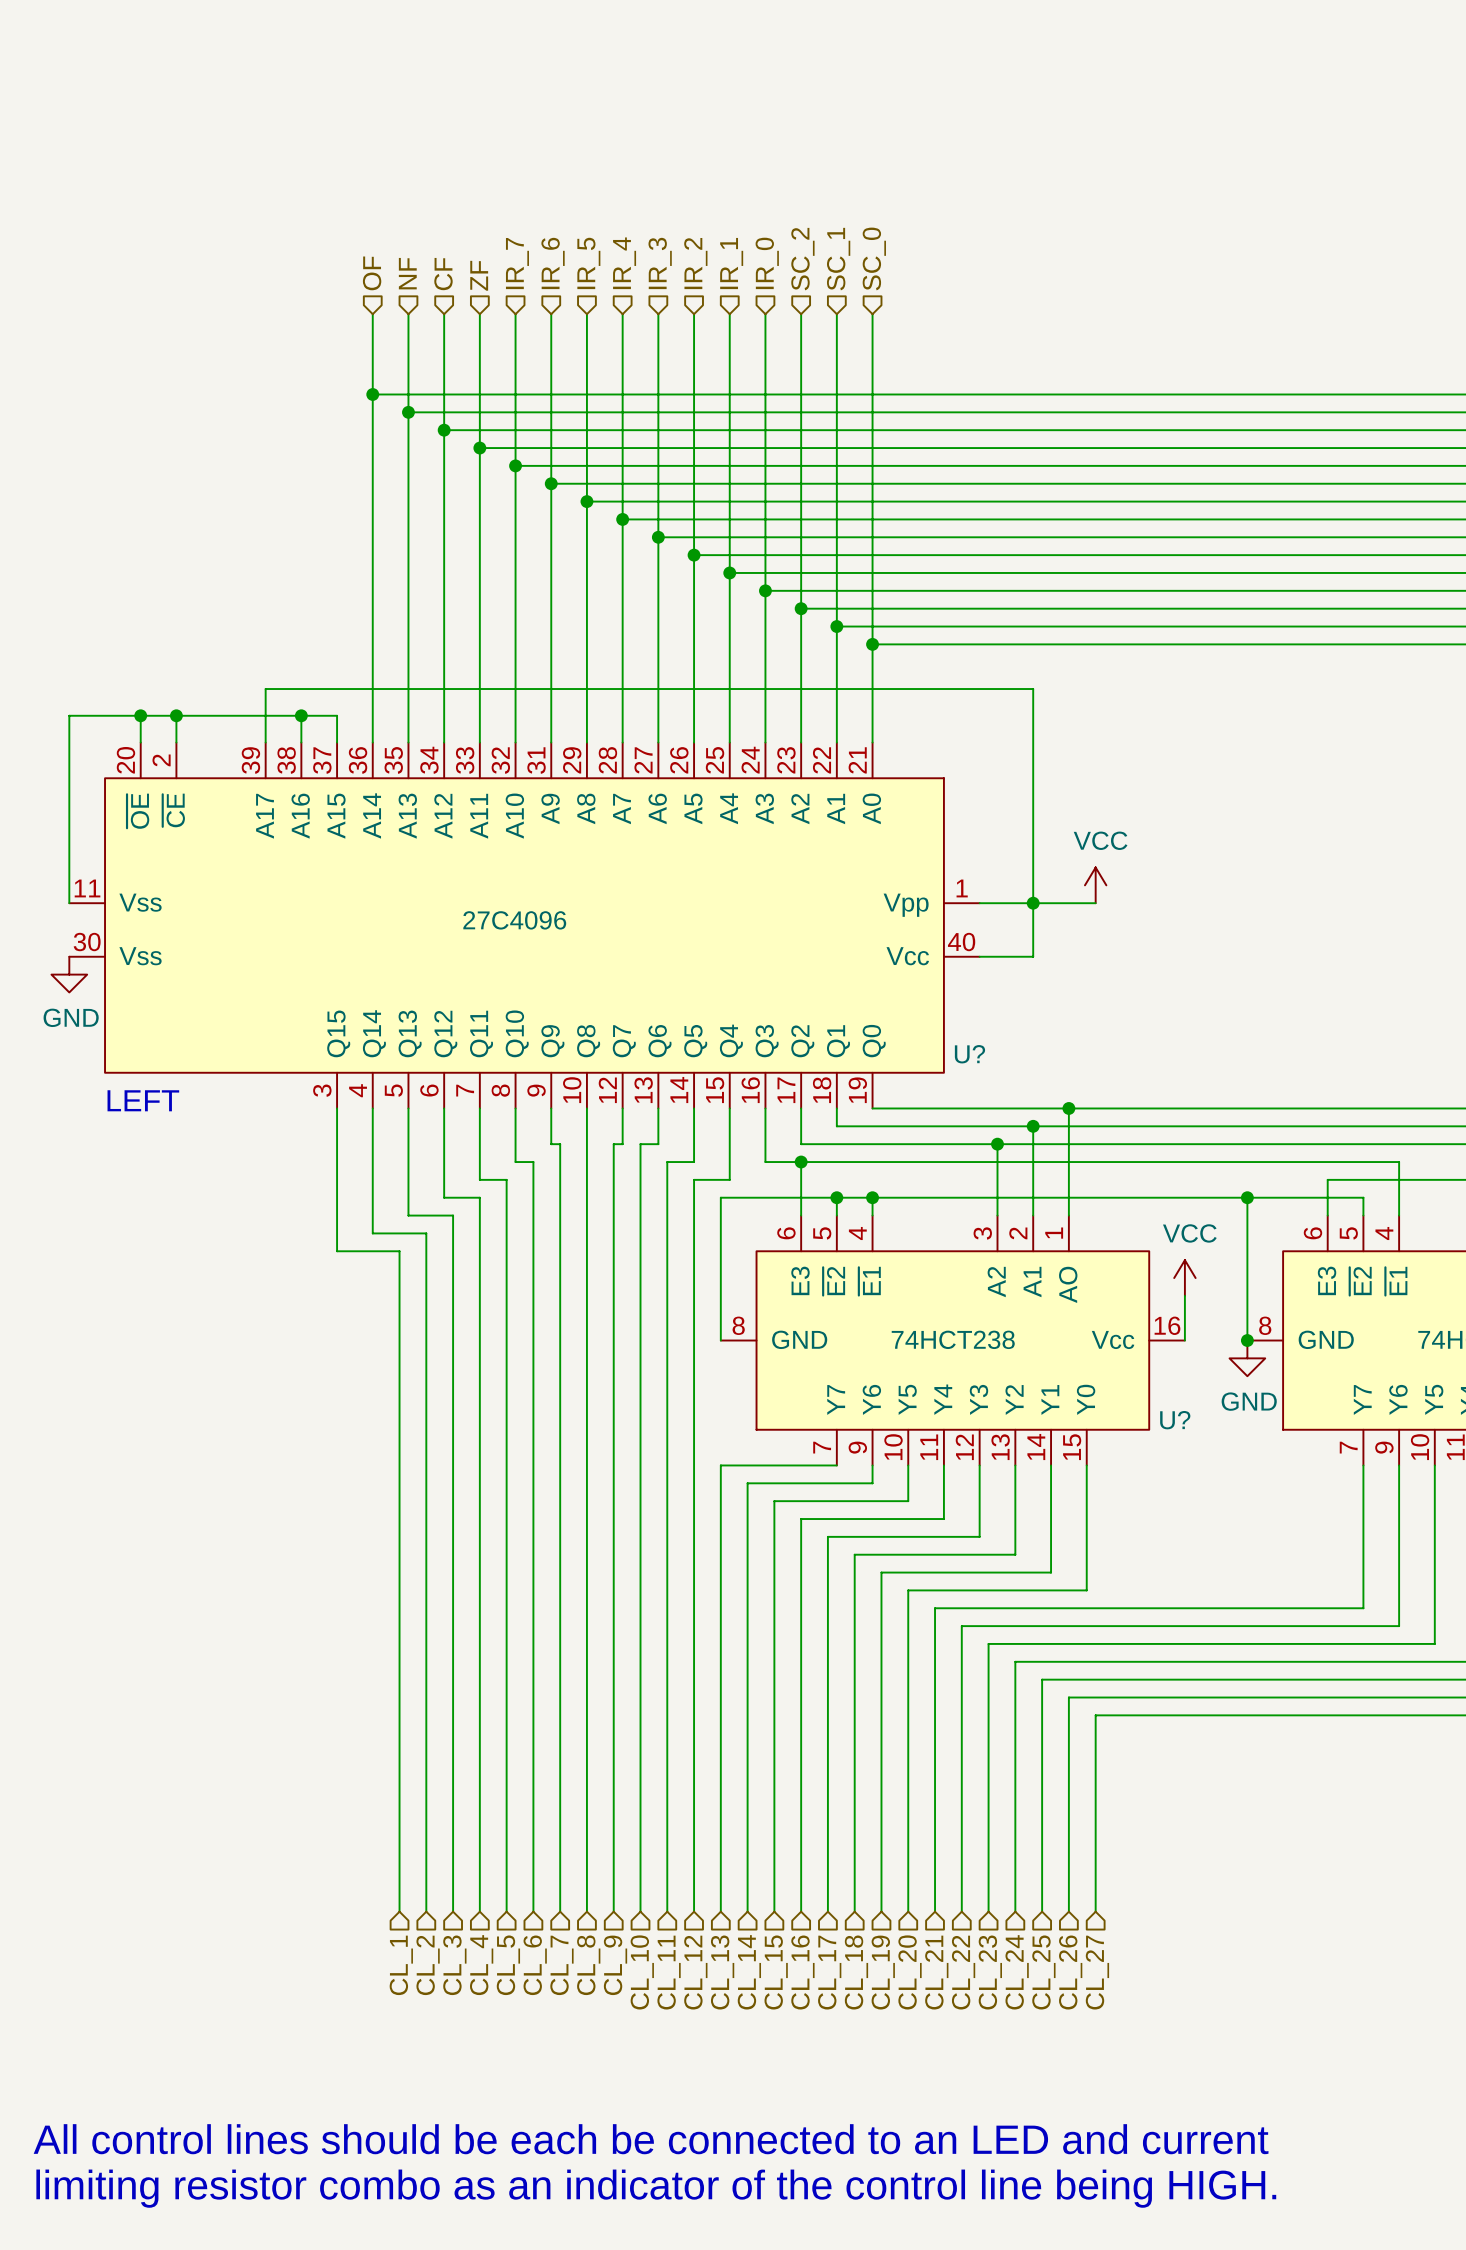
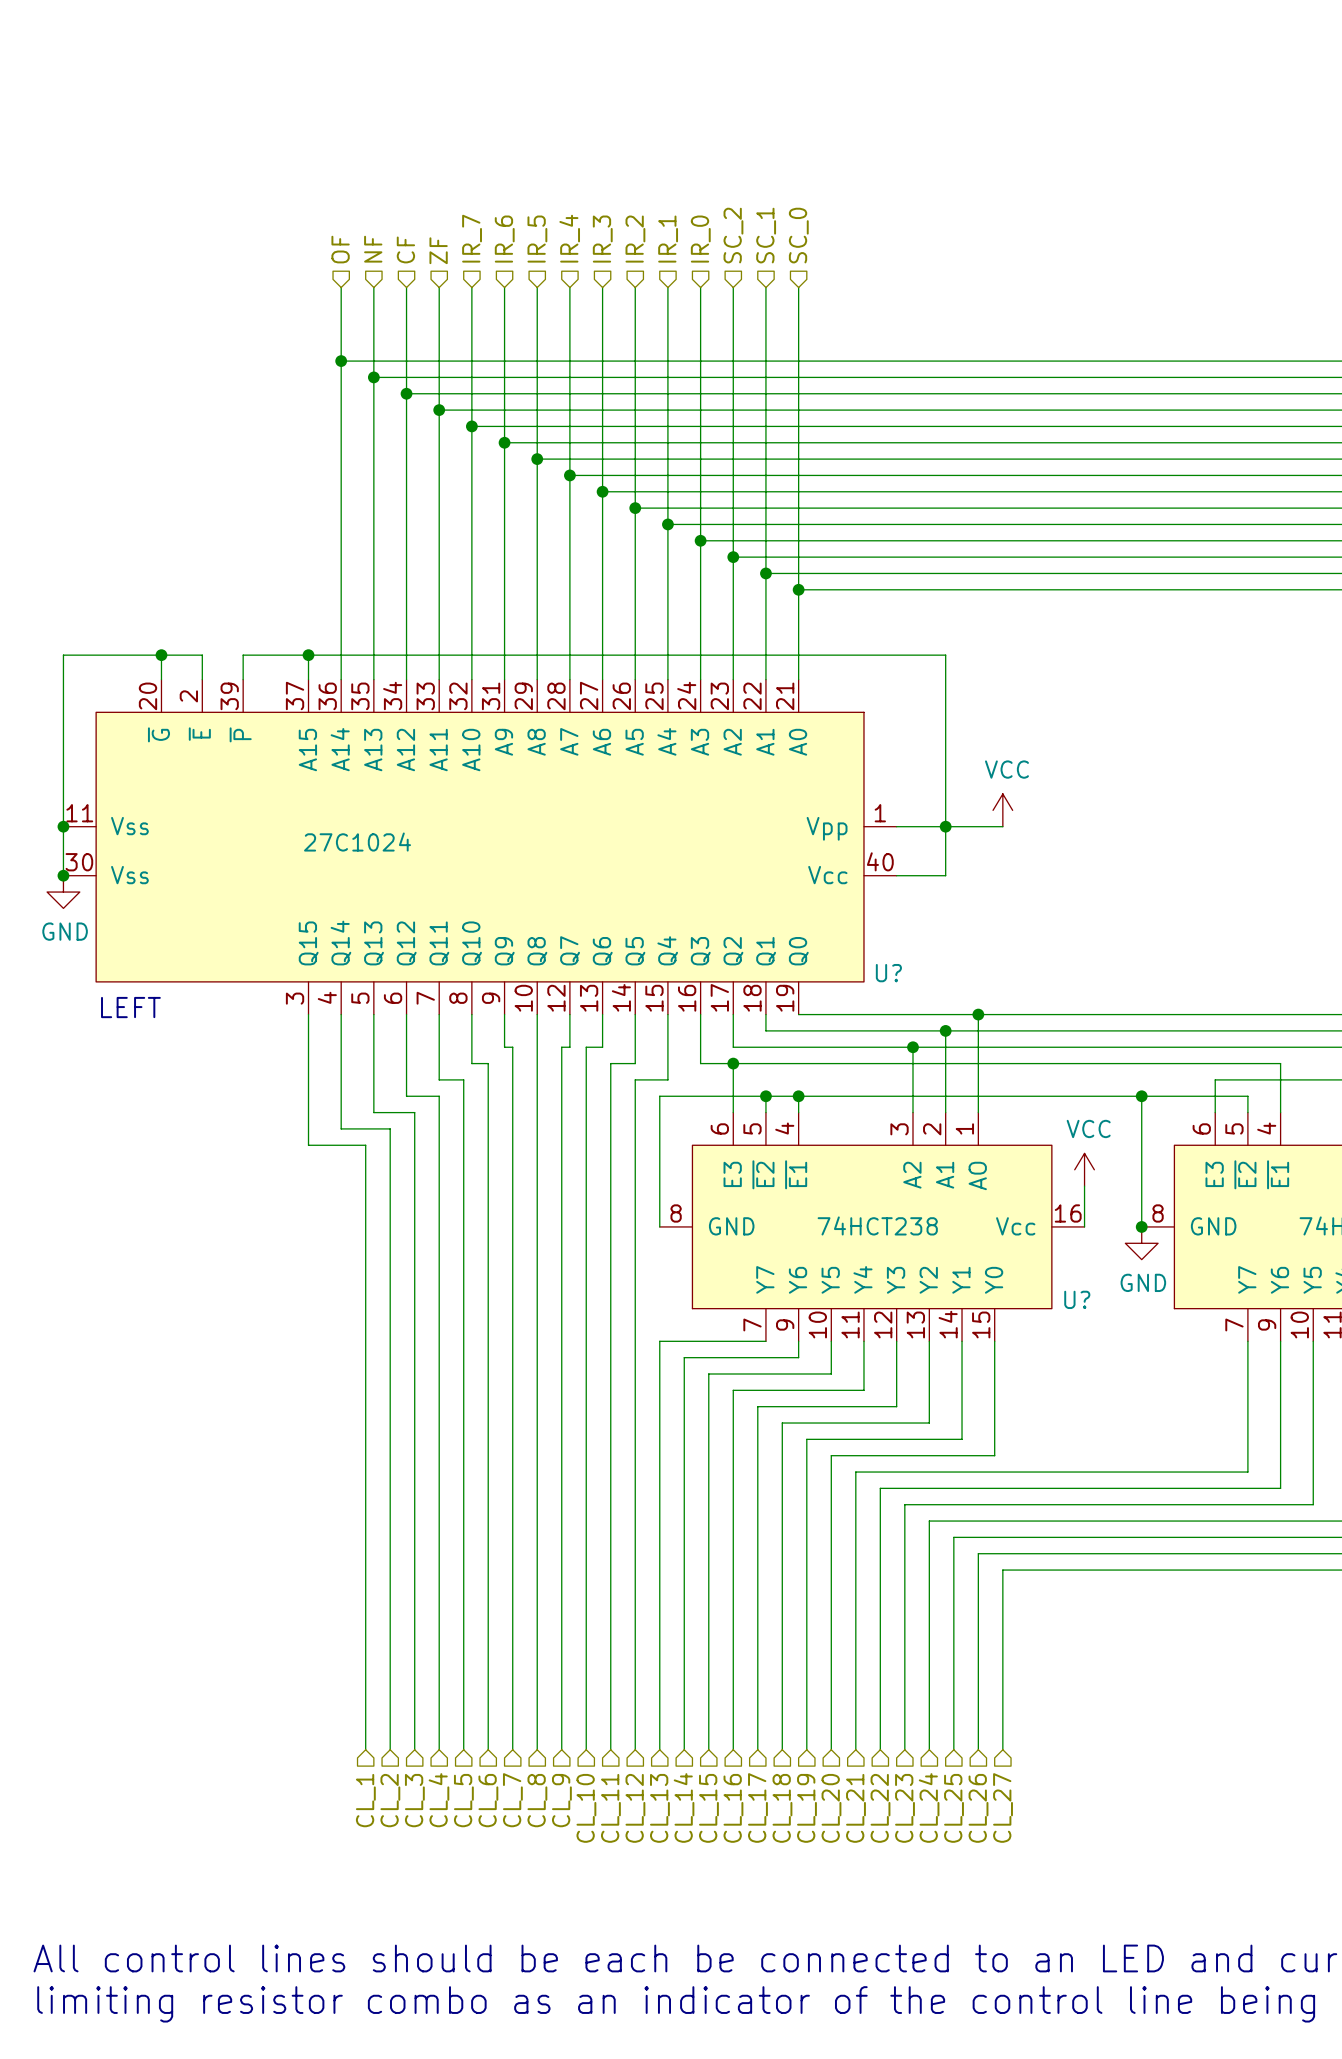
wire: (140, 715) (140, 742) -> (202, 655) (202, 679)
junction: (140, 715) -> none
wire: (221, 715) (265, 715) (265, 689) (1033, 689) (1033, 715) -> (308, 655) (945, 655)
wire: (301, 715) (301, 742) -> none
junction position: (301, 715) -> (308, 655)
U? symbol: [69, 742, 980, 1109] -> [63, 679, 897, 1015]
wire: none -> (63, 826) (63, 875)
junction: none -> (63, 826)
U? value: 27C4096 (514, 920) -> 27C1024 (357, 842)
junction: none -> (63, 875)

